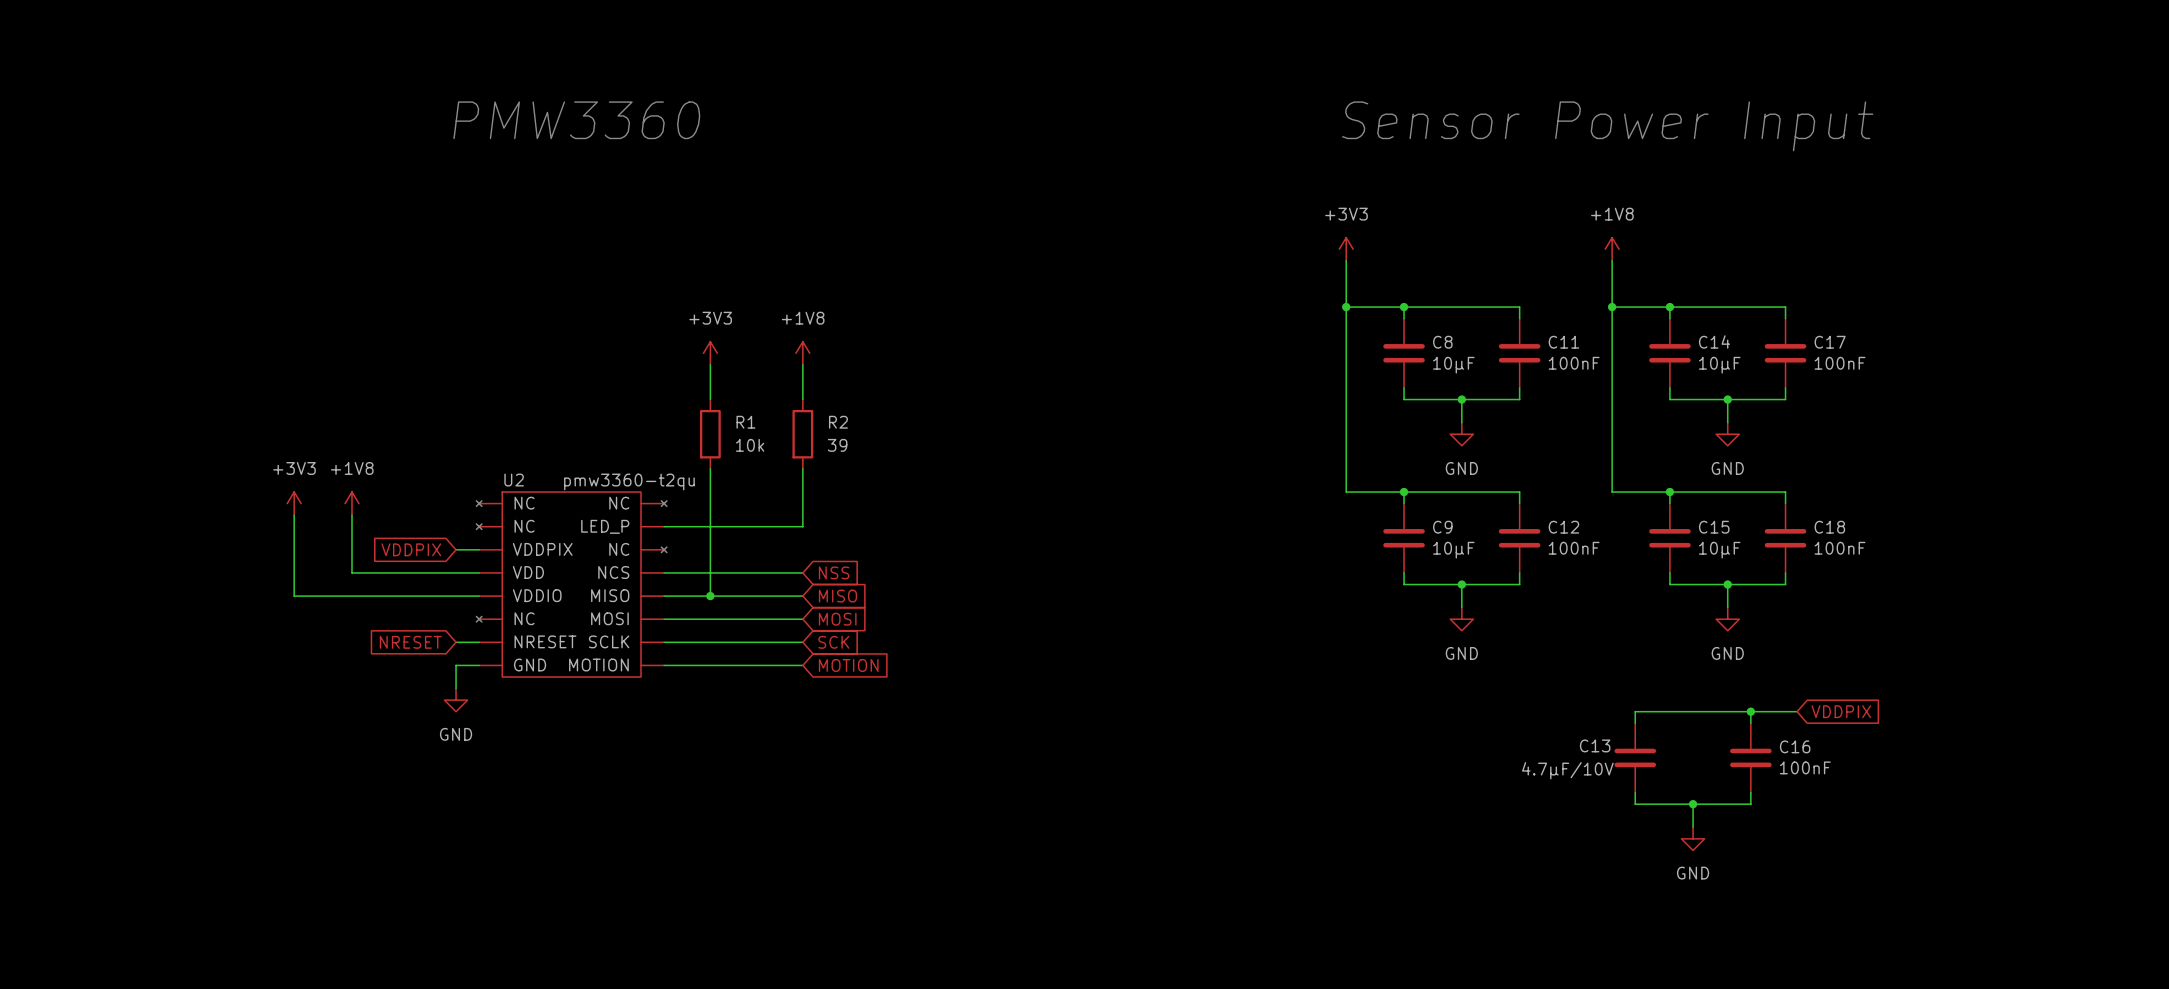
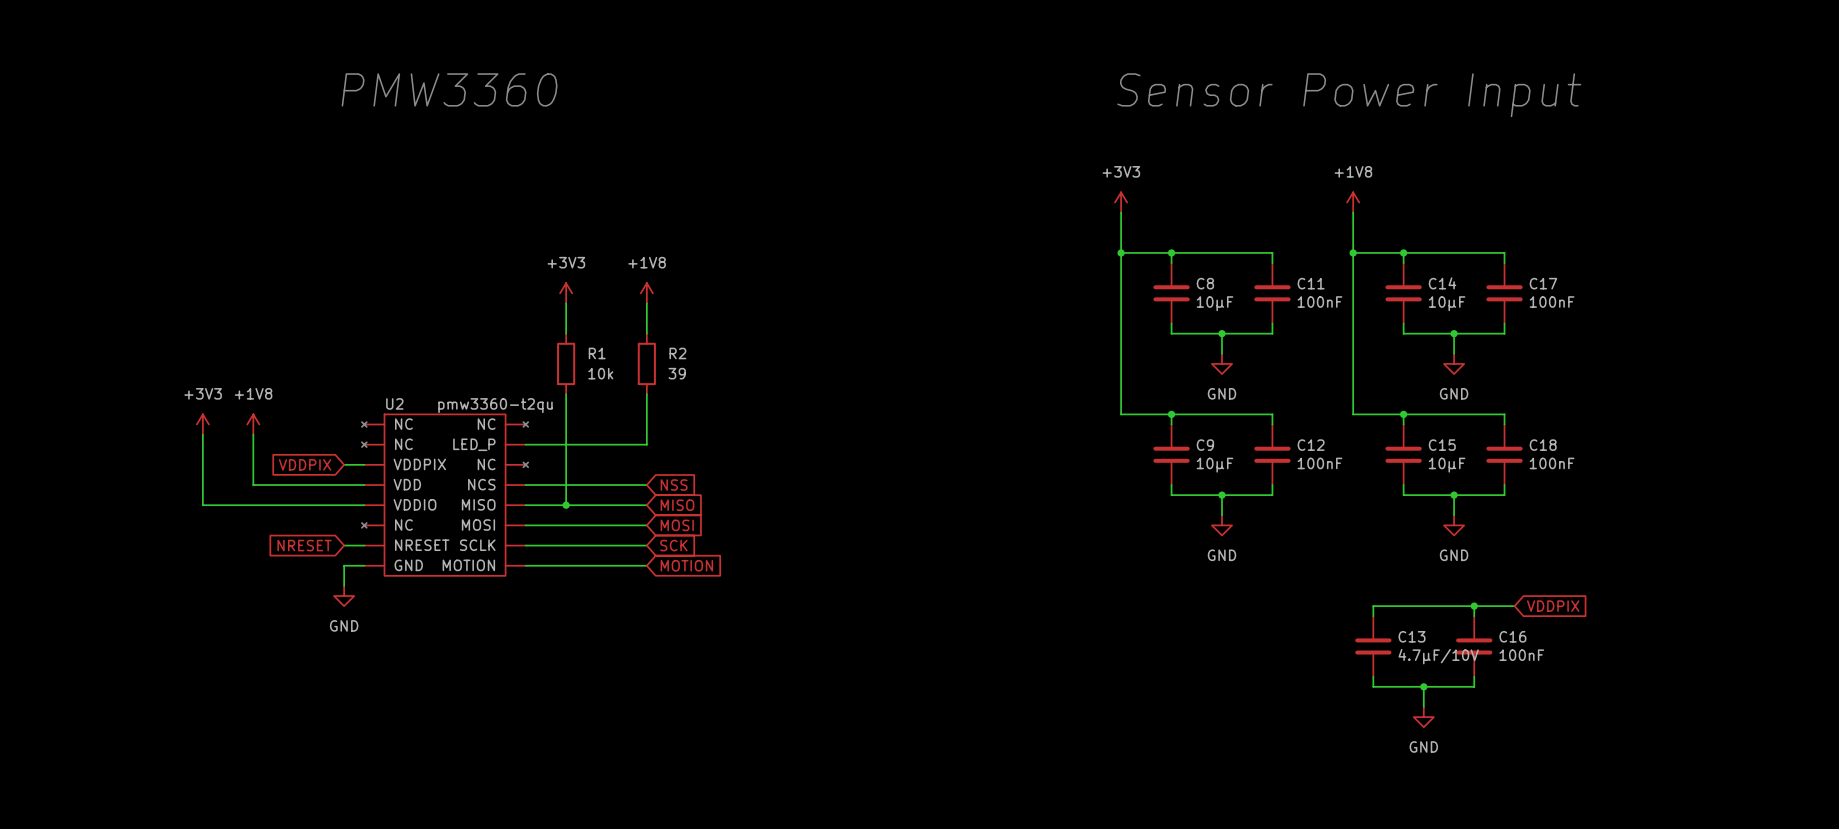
C13 name position: C13 (1595, 745) -> C13 (1412, 636)
C13 value position: 4.7μF/10V (1567, 770) -> 4.7μF/10V (1438, 656)

